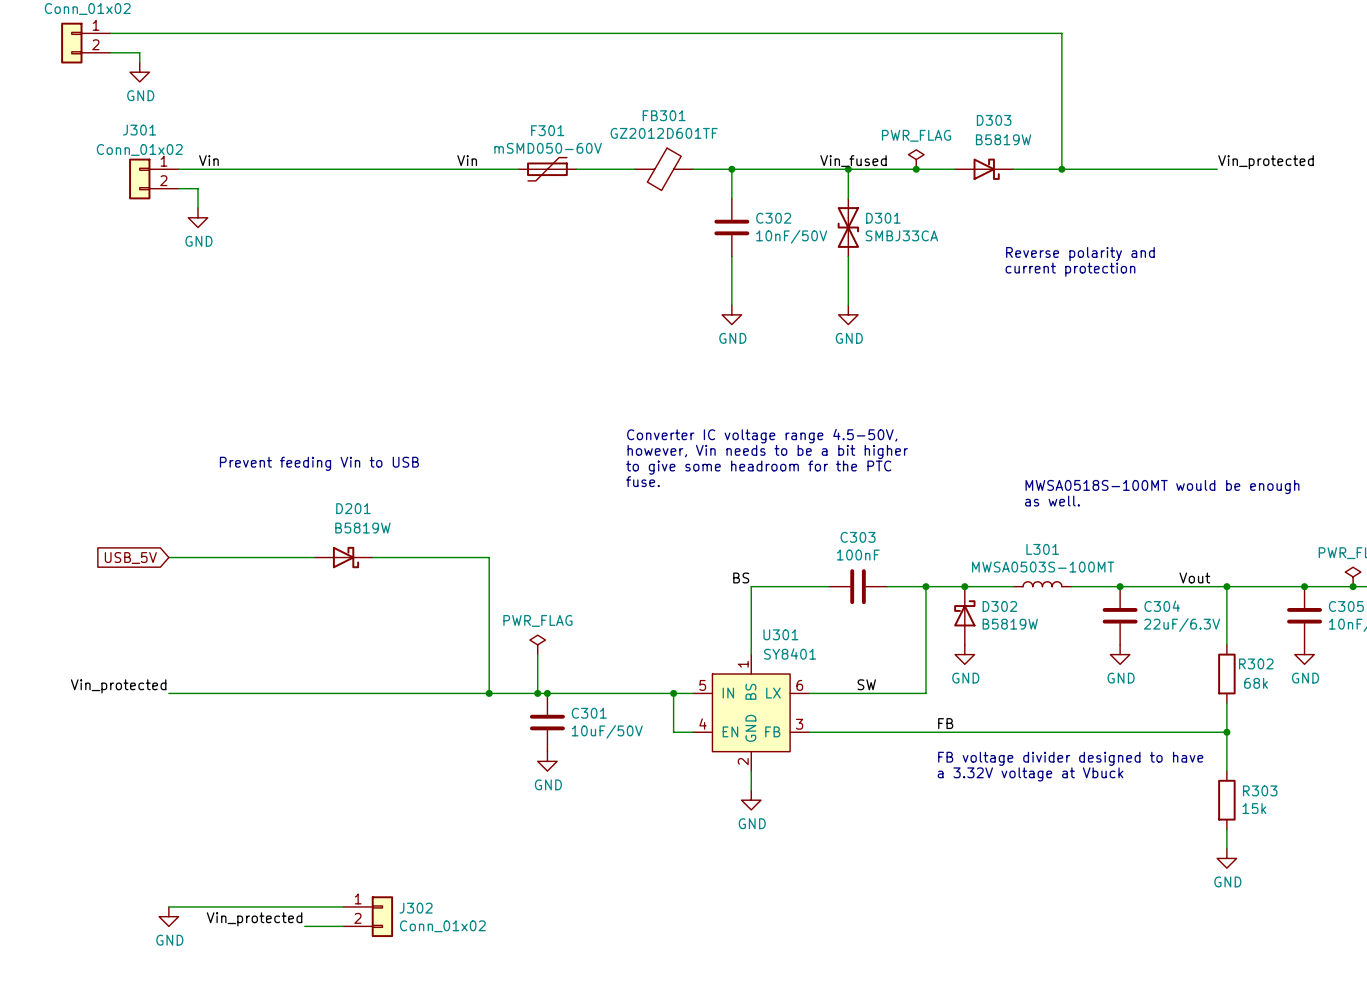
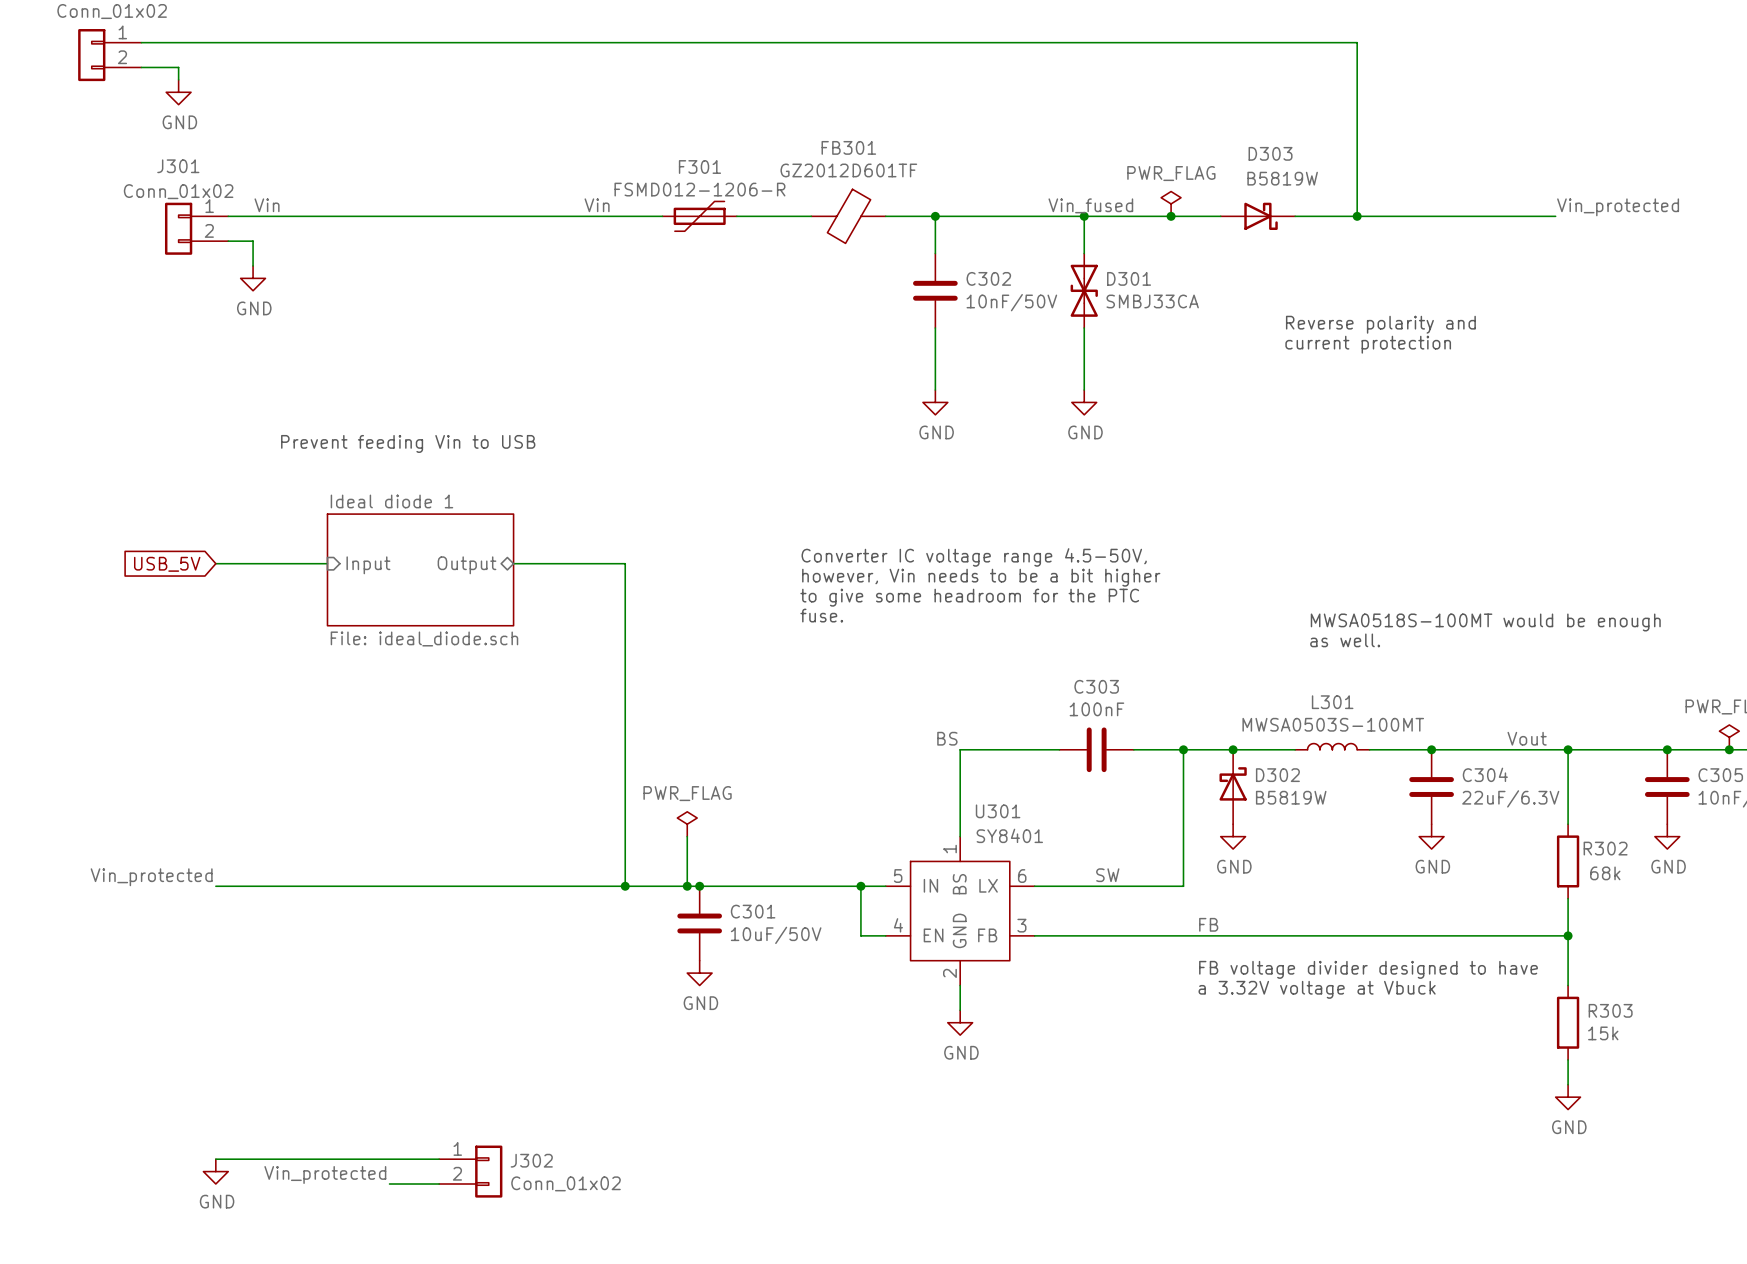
F301 value: mSMD050-60V (548, 148) -> FSMD012-1206-R (699, 189)
wire: none -> (215, 563) (327, 563)
sheet pin: none -> Input (368, 565)
sheet pin: none -> Output (467, 565)
sheet Ideal diode 1: none -> File: ideal_diode.sch (420, 569)
text position: Prevent feeding Vin to USB (319, 463) -> Prevent feeding Vin to USB (408, 443)
global label position: USB_5V (130, 557) -> USB_5V (167, 564)
wire: (168, 557) (314, 557) -> none
D201: B5819W (343, 557) -> none
wire: (372, 557) (489, 557) -> (513, 563) (625, 563) (625, 712)

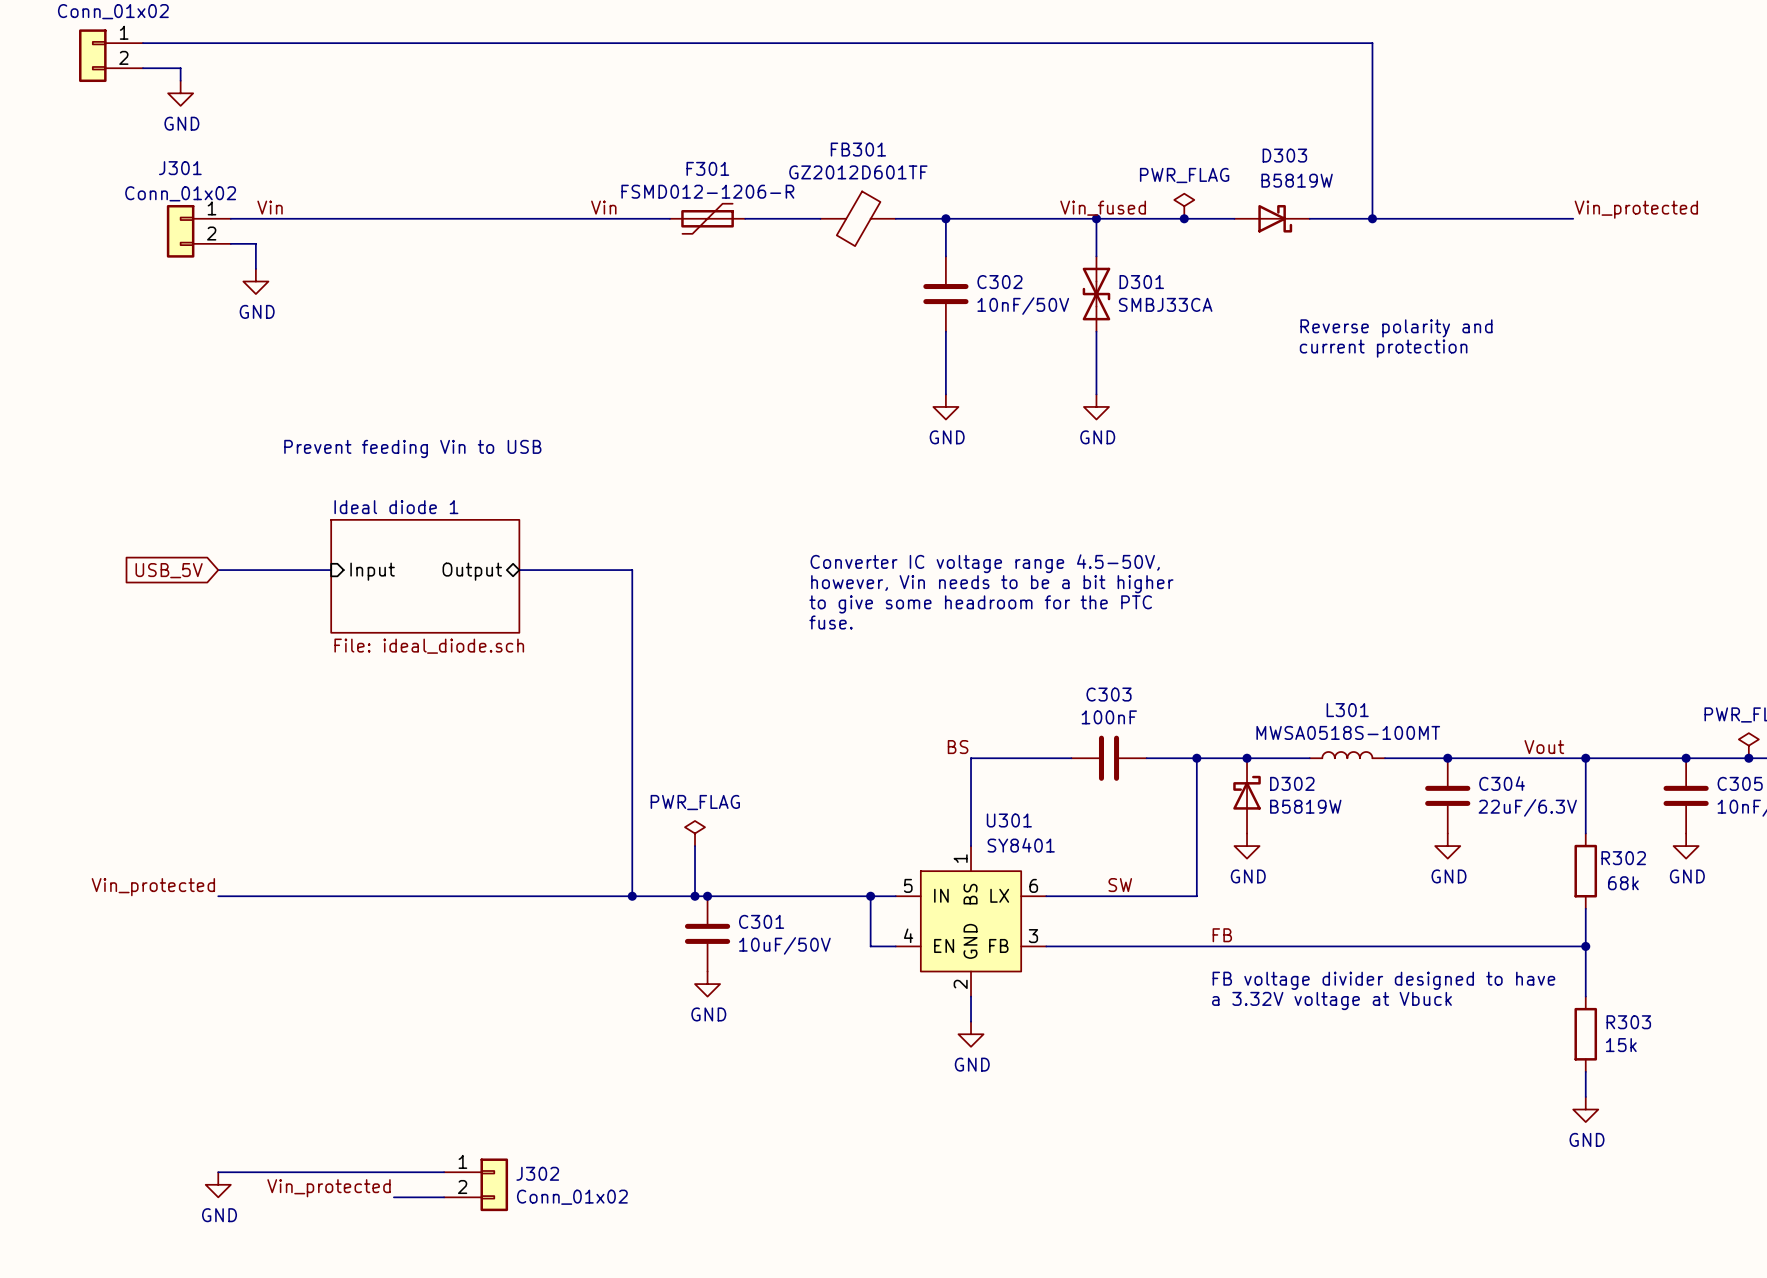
text: MWSA0518S-100MT would be enough (1485, 622) -> none
text: as well. (1345, 640) -> none
L301 value: MWSA0503S-100MT (1333, 724) -> MWSA0518S-100MT (1348, 732)

